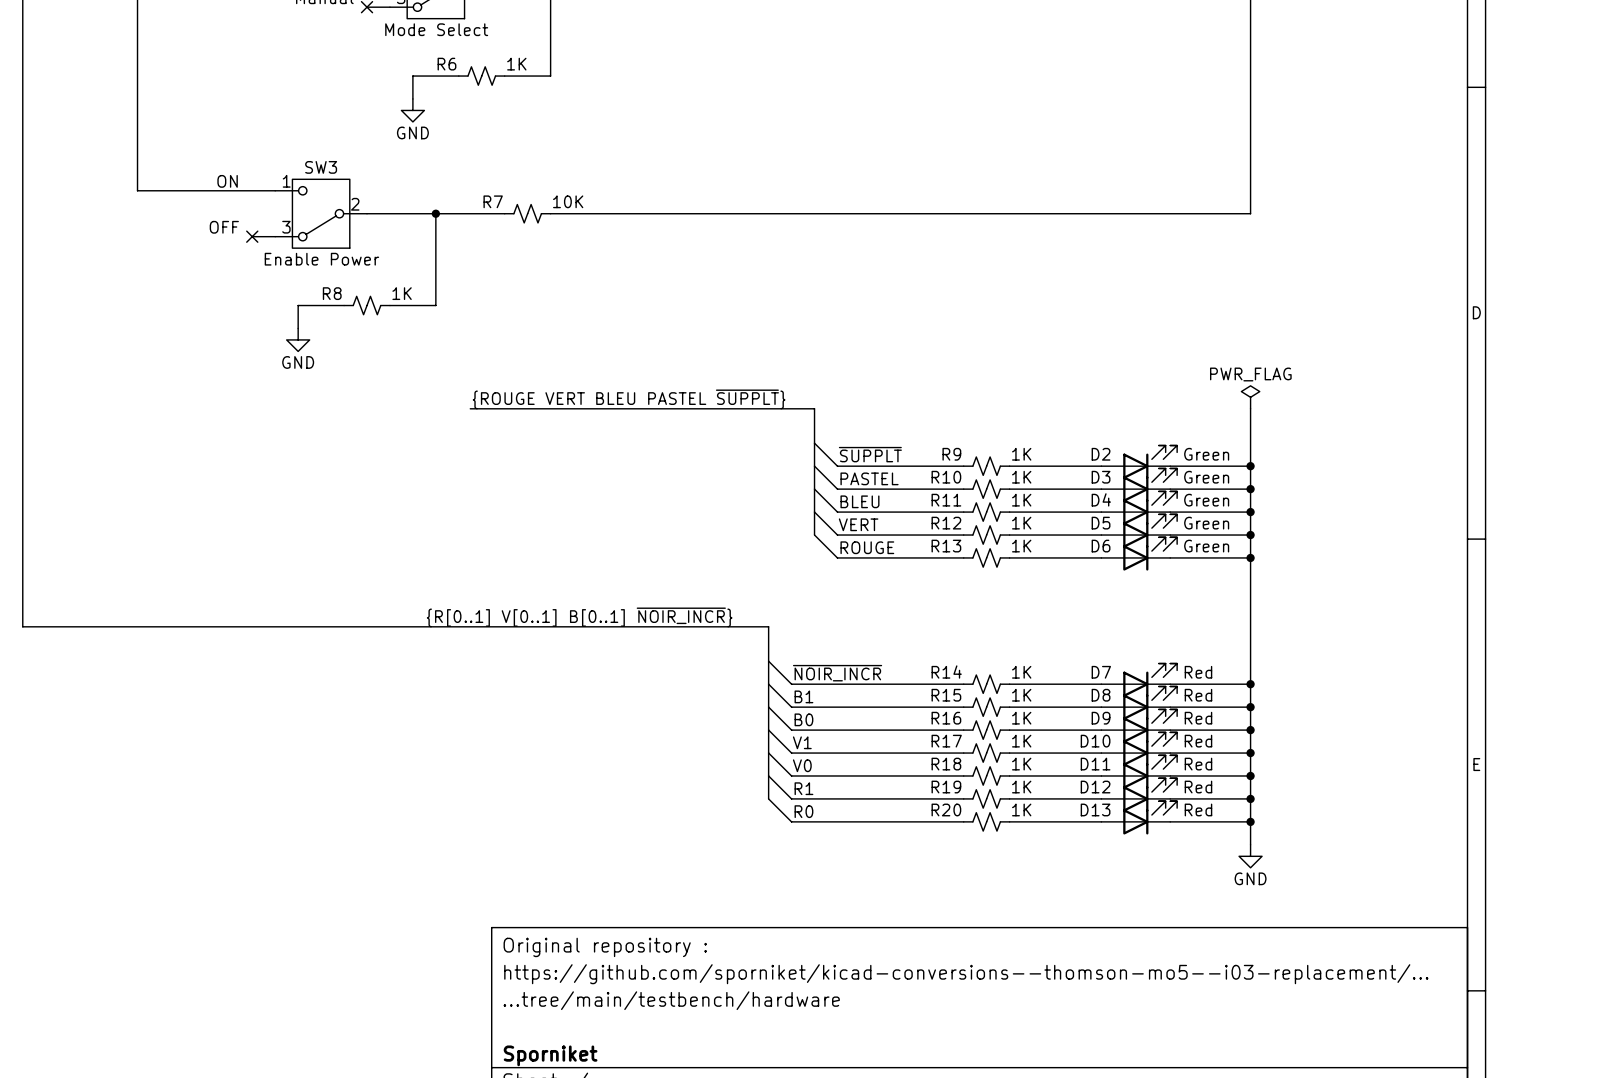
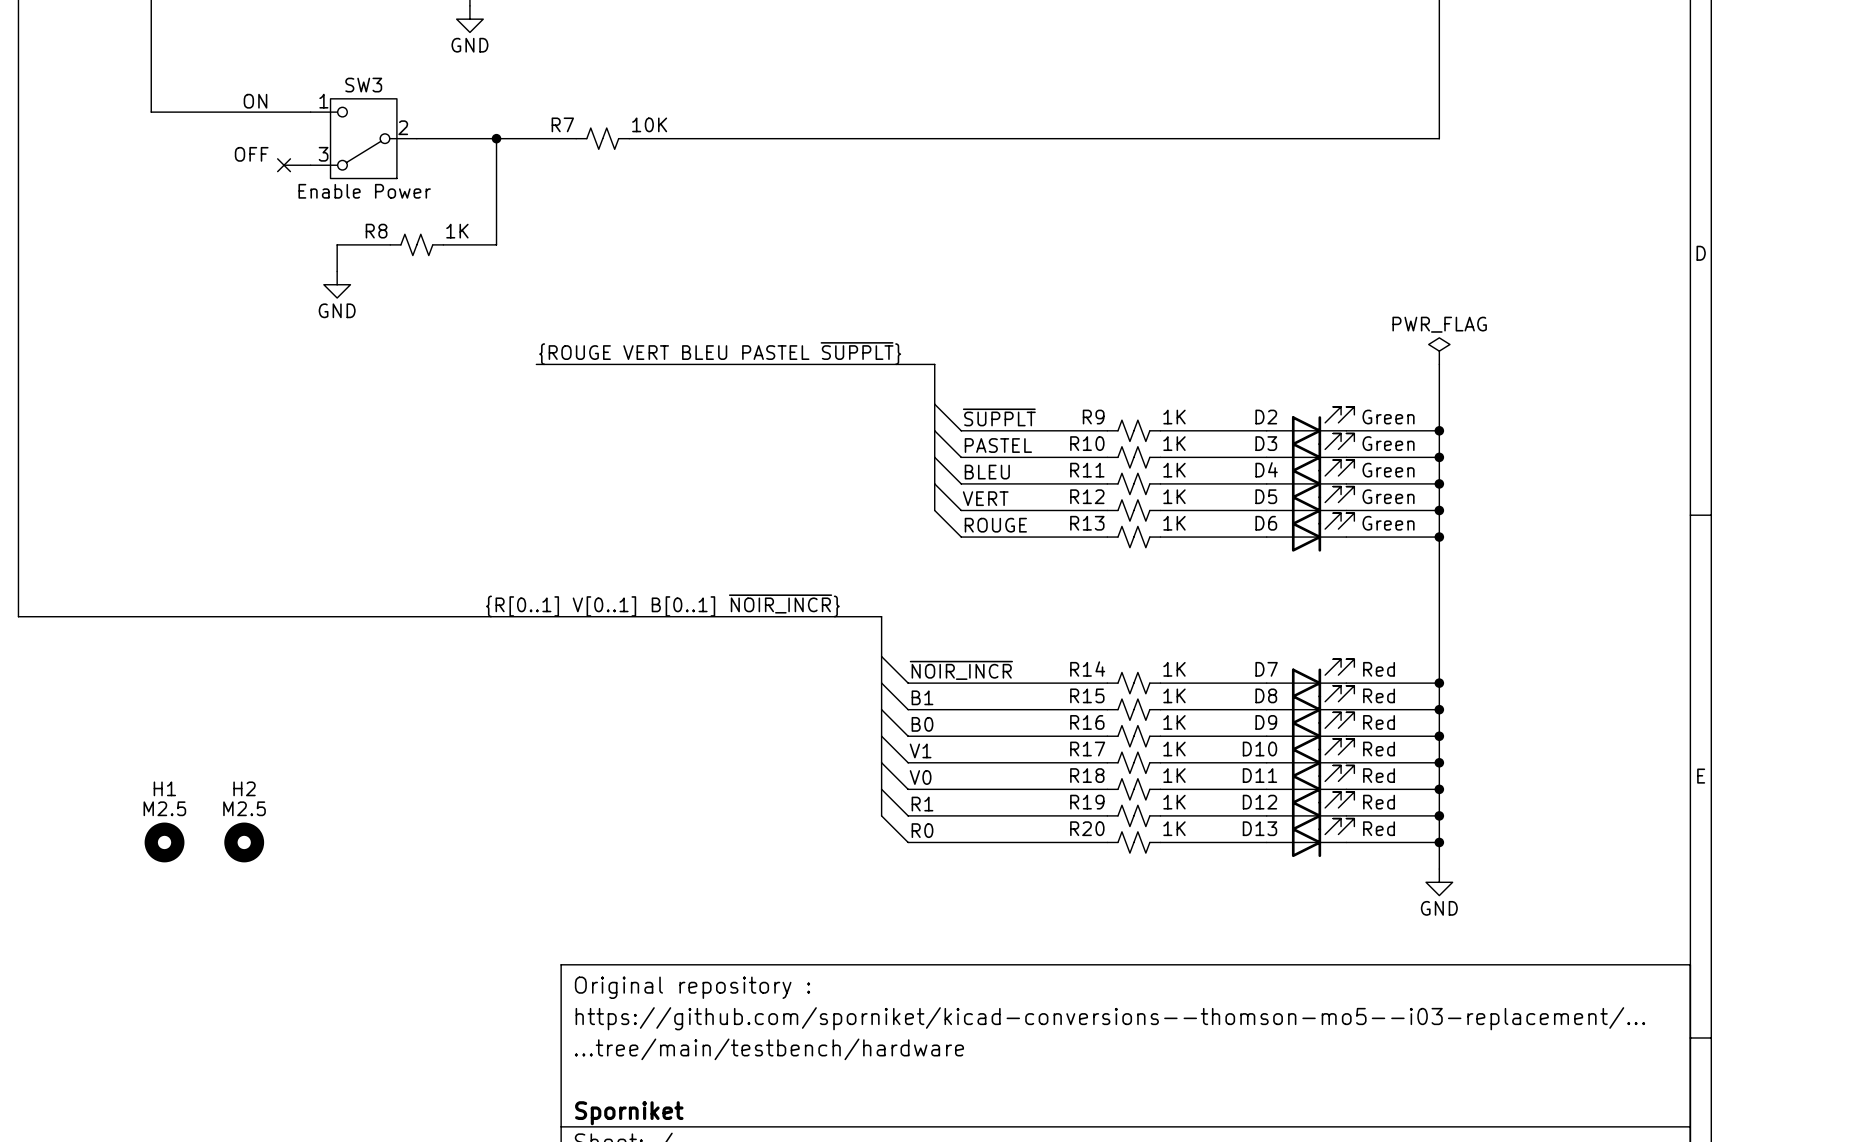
H1: none -> M2.5 (164, 842)
H2: none -> M2.5 (244, 842)

